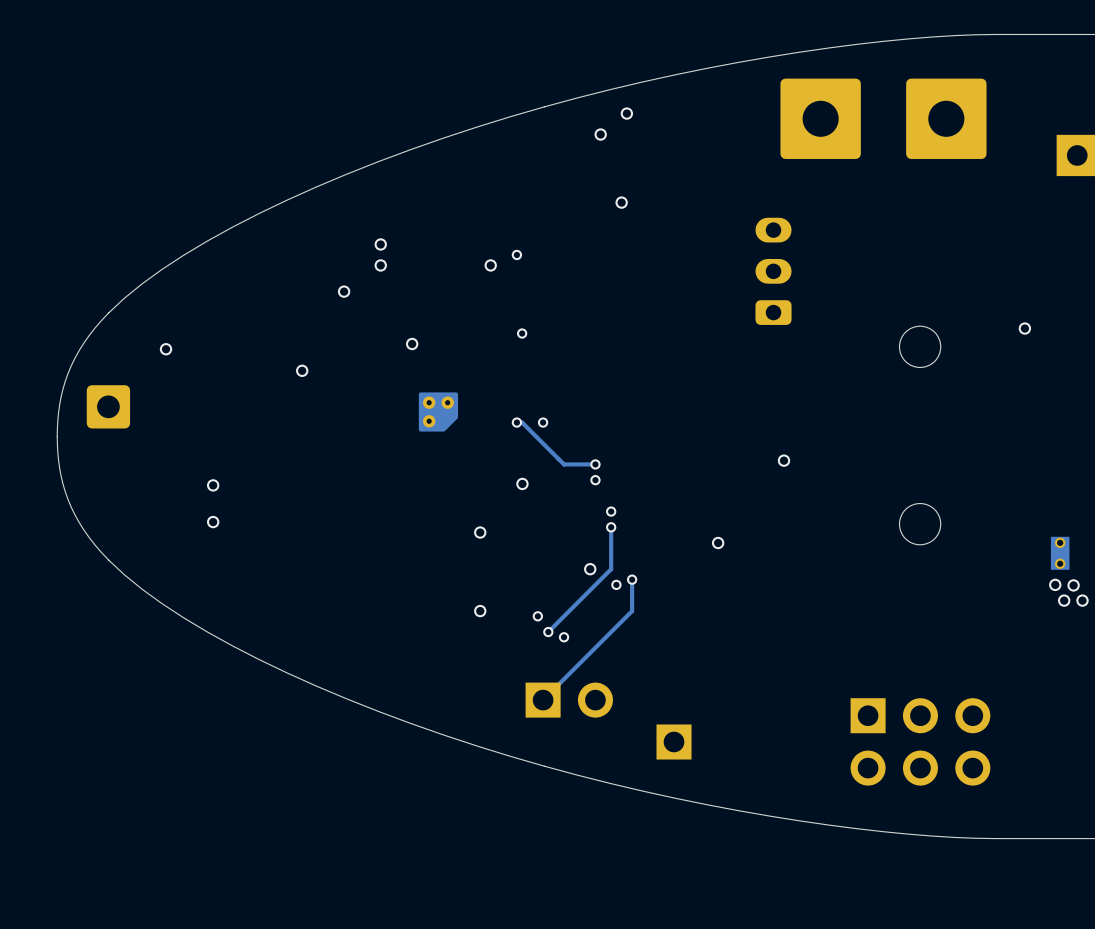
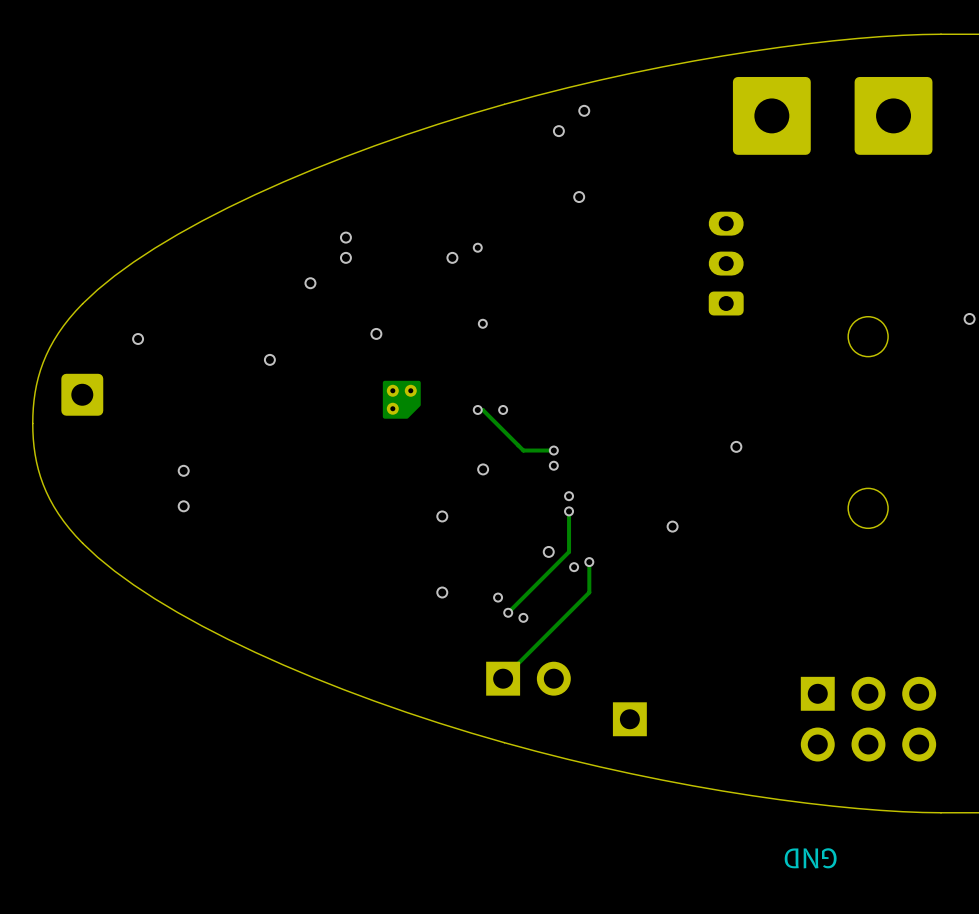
text: none -> GND (810, 858)

